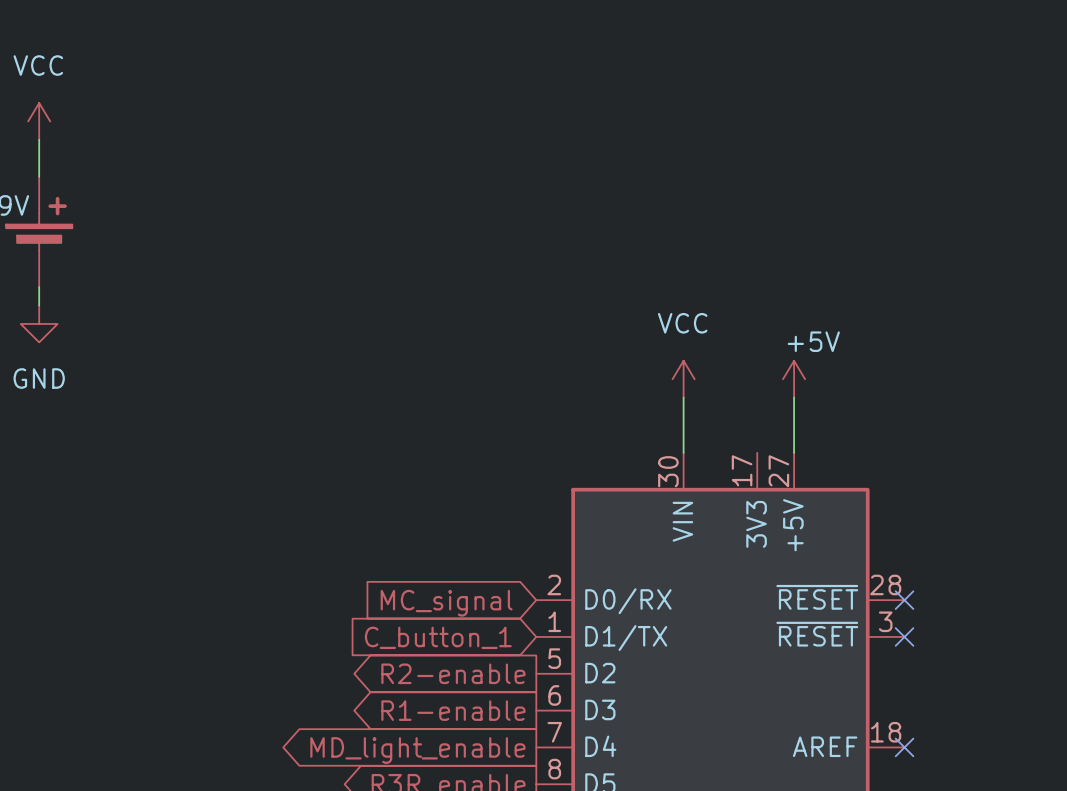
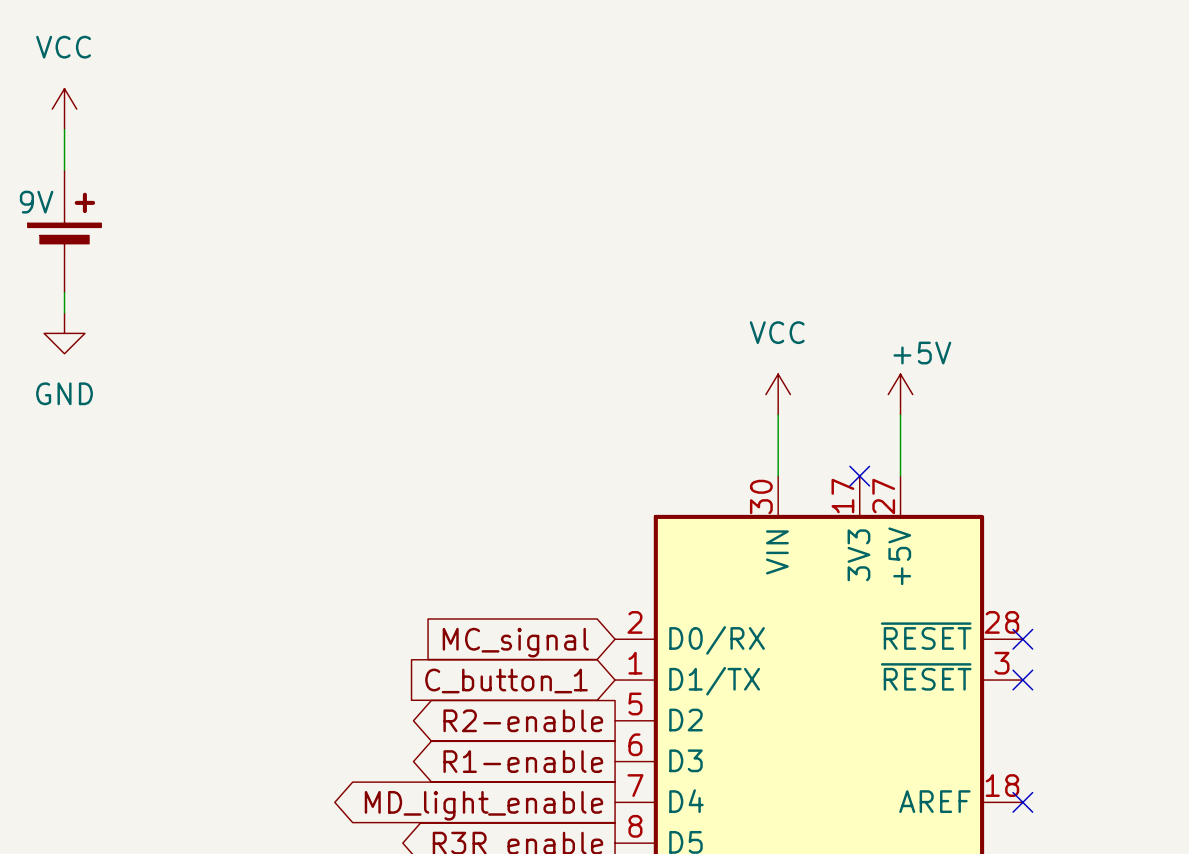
no-connect mark: none -> (859, 476)

